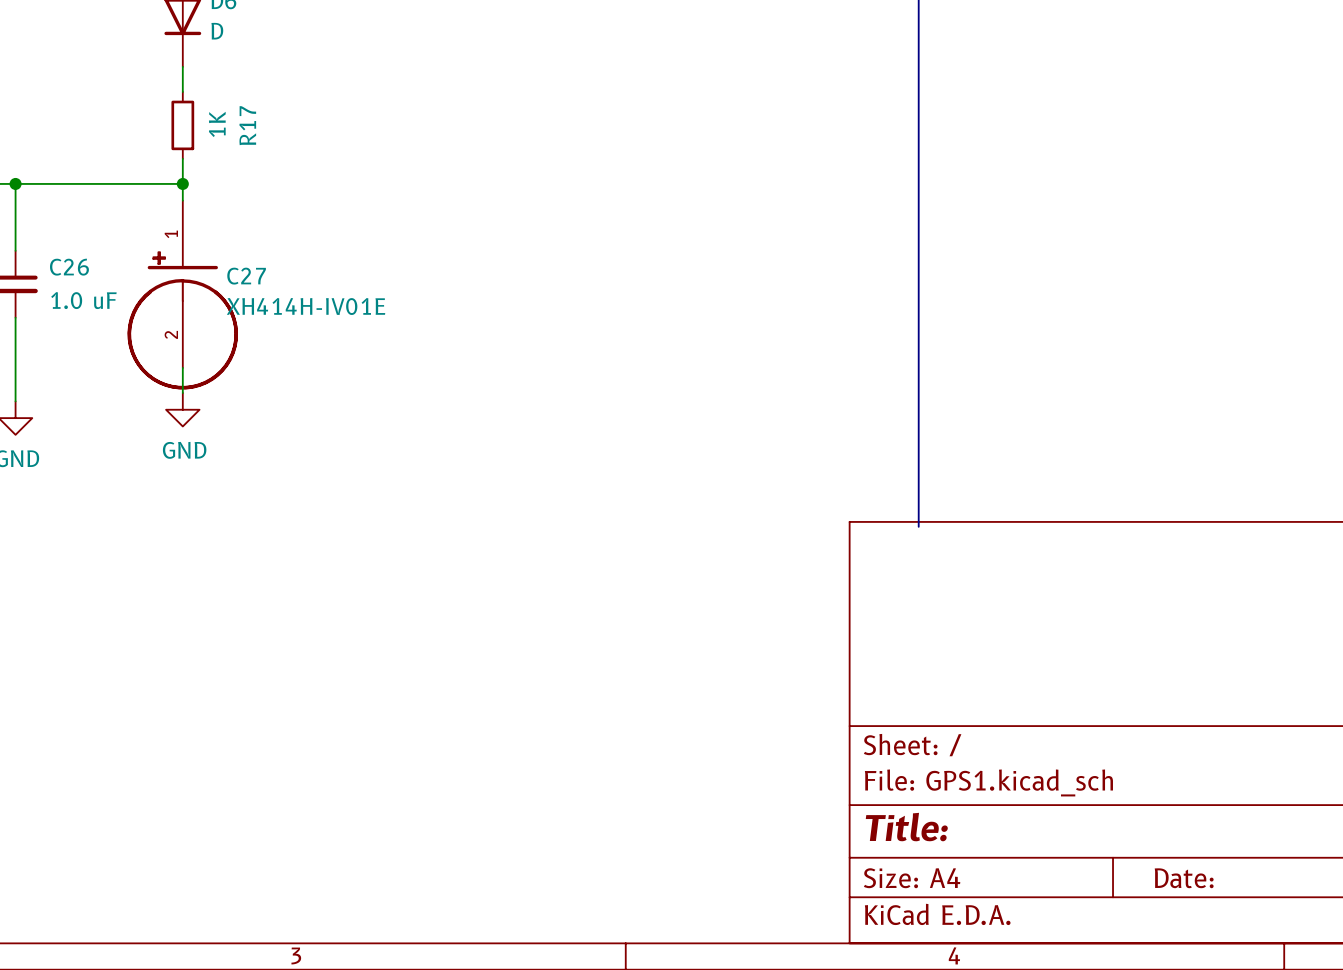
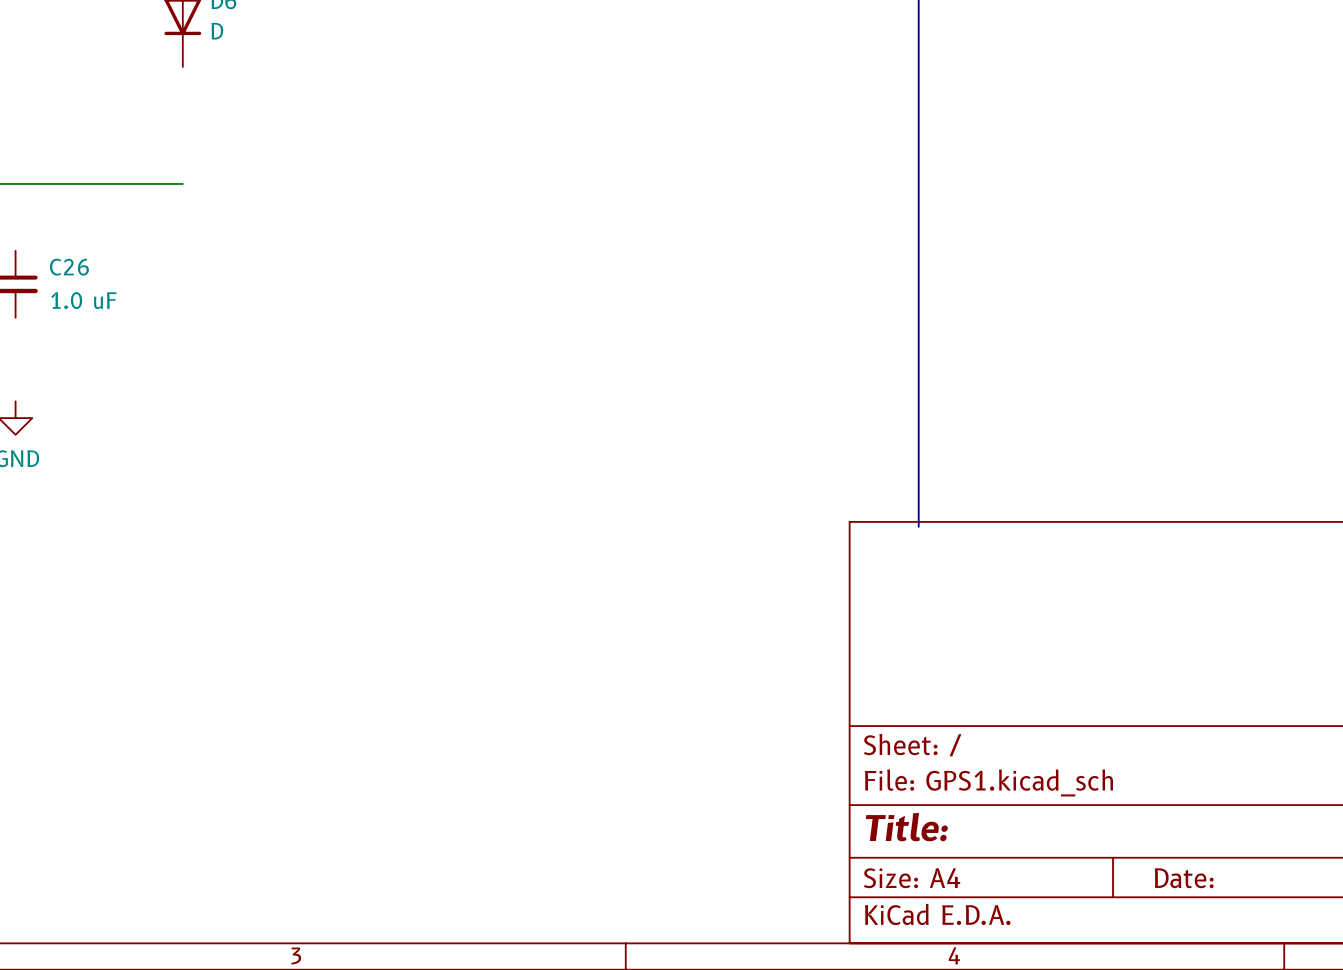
wire: (182, 66) (182, 91) -> none
R17: 1K (182, 125) -> none
wire: (182, 158) (182, 200) -> none
wire: (15, 183) (15, 250) -> none
junction: (15, 183) -> none
junction: (182, 183) -> none
C27: XH414H-IV01E (182, 295) -> none
wire: (15, 317) (15, 401) -> none
wire: (182, 367) (182, 393) -> none
power symbol: GND (182, 409) -> none

